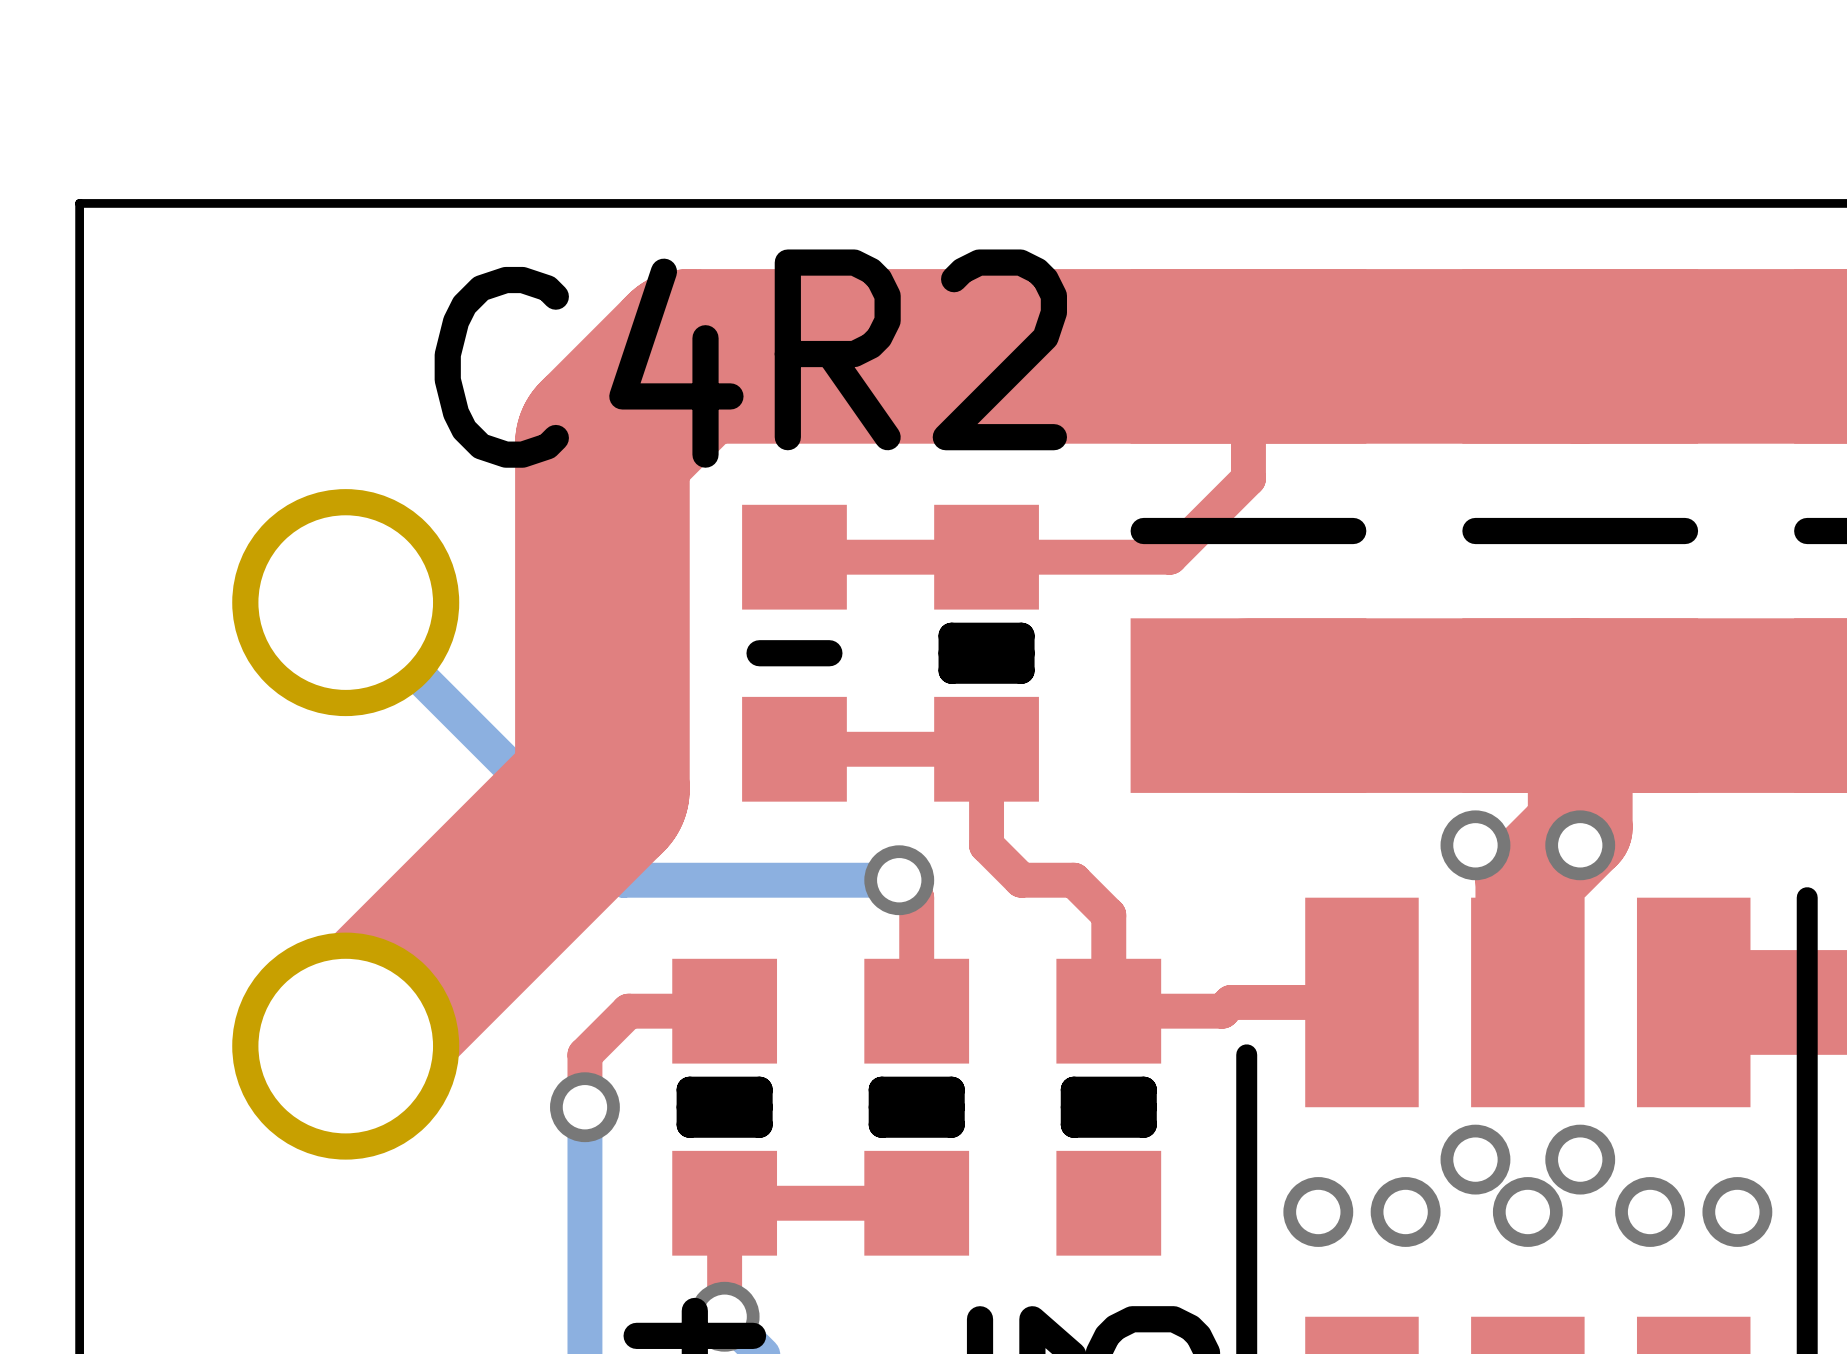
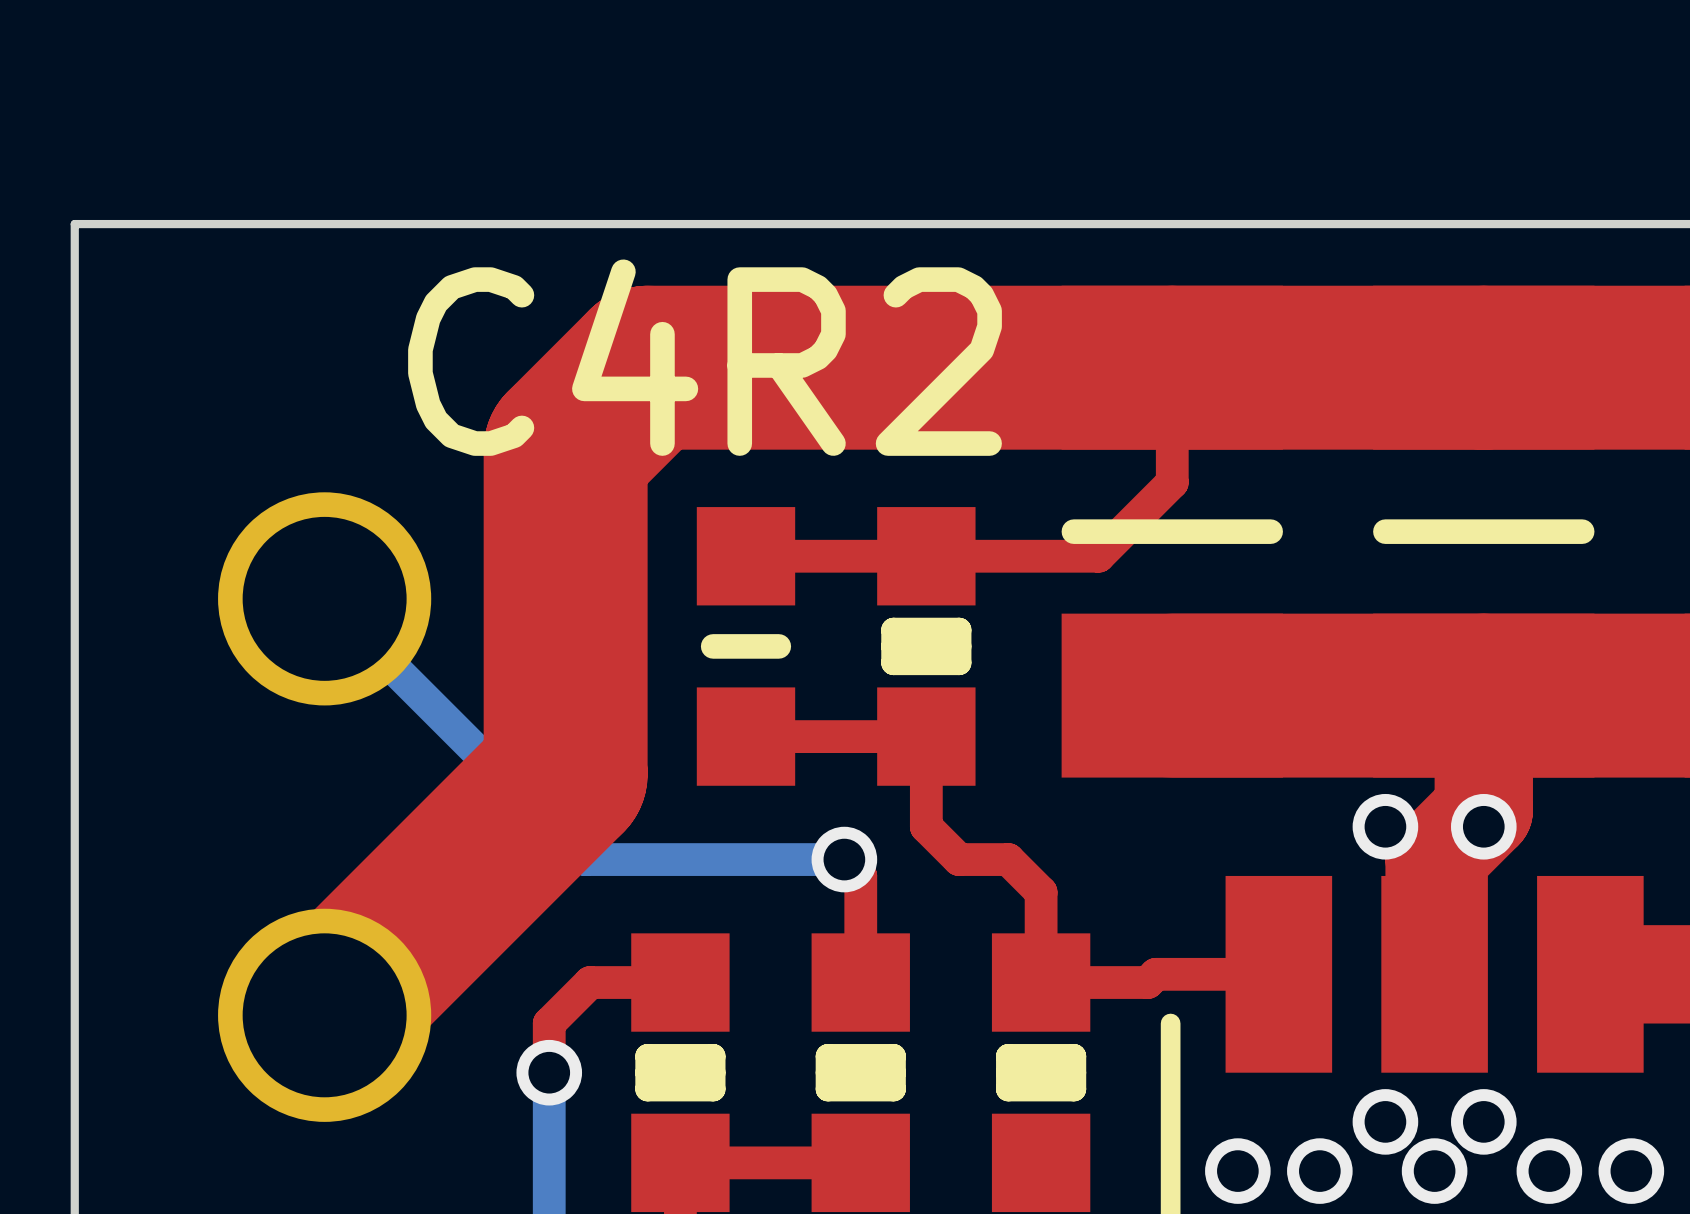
C4 name position: C4 (589, 363) -> C4 (553, 357)

